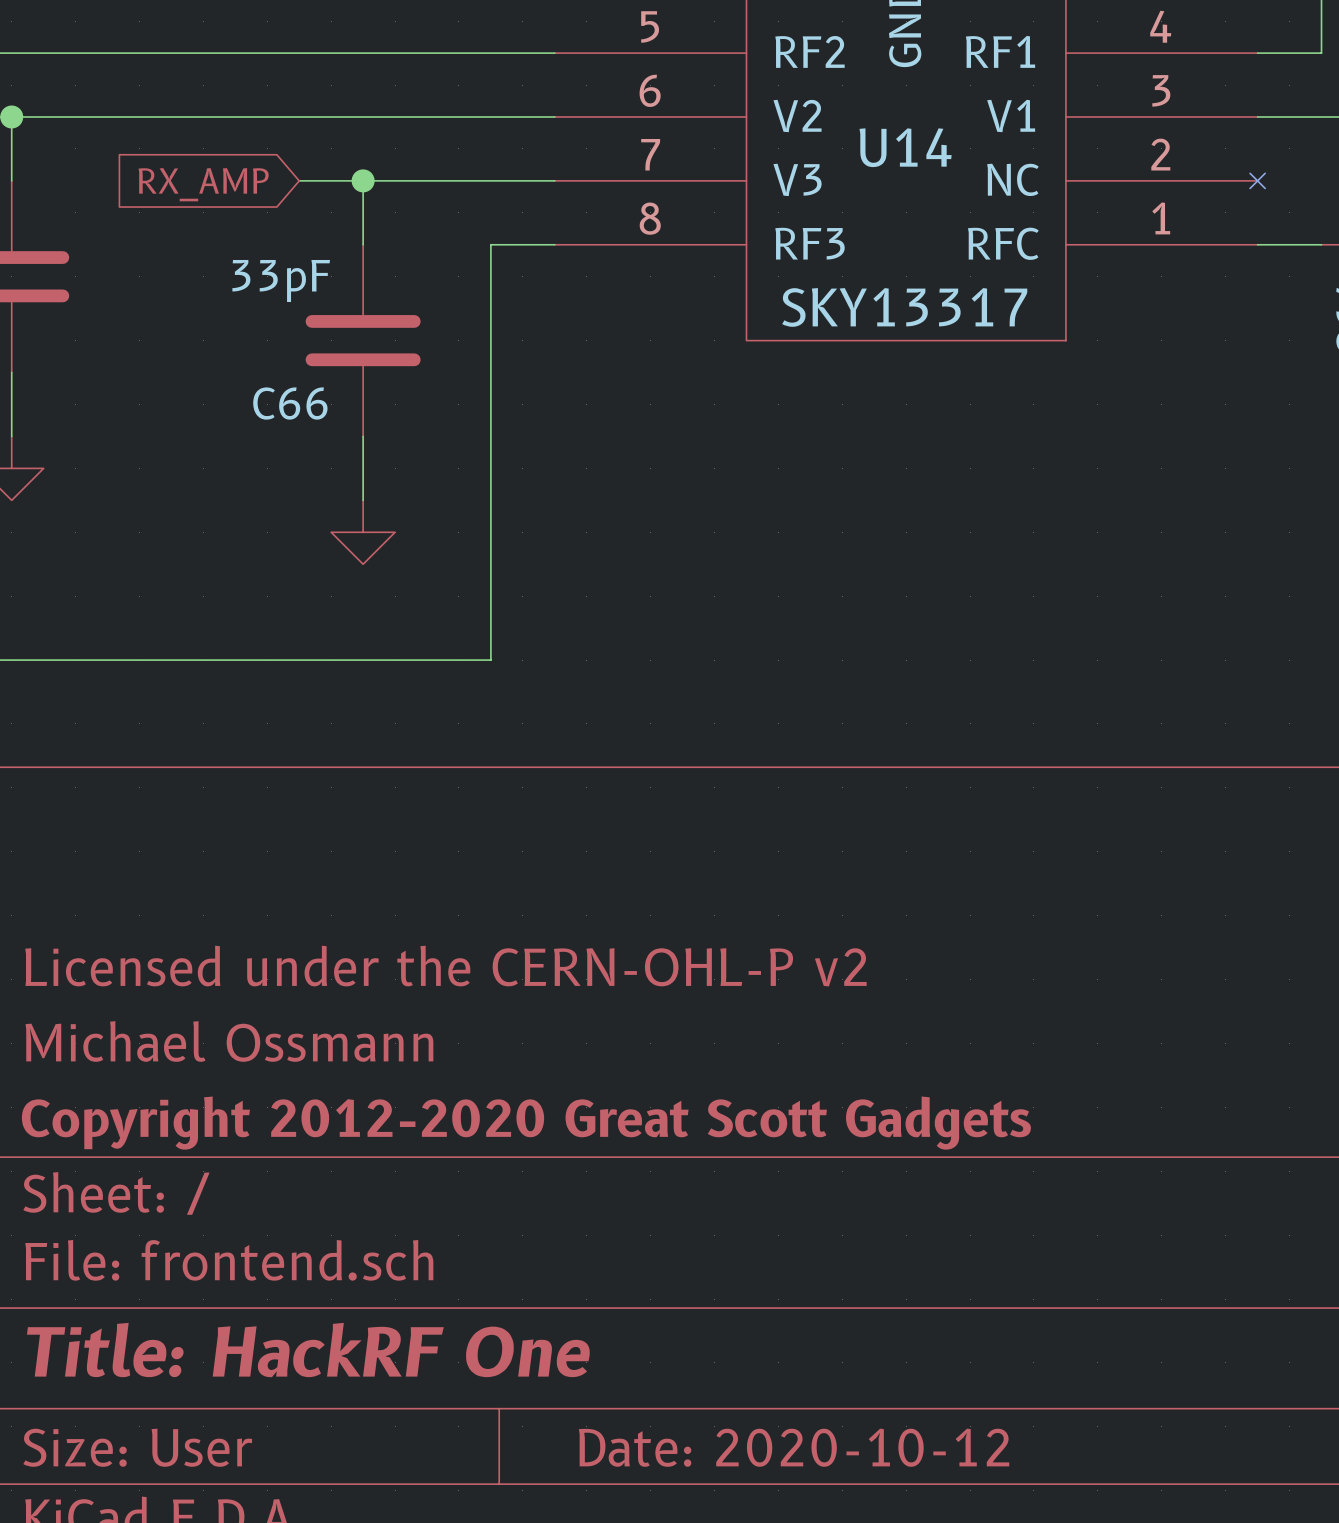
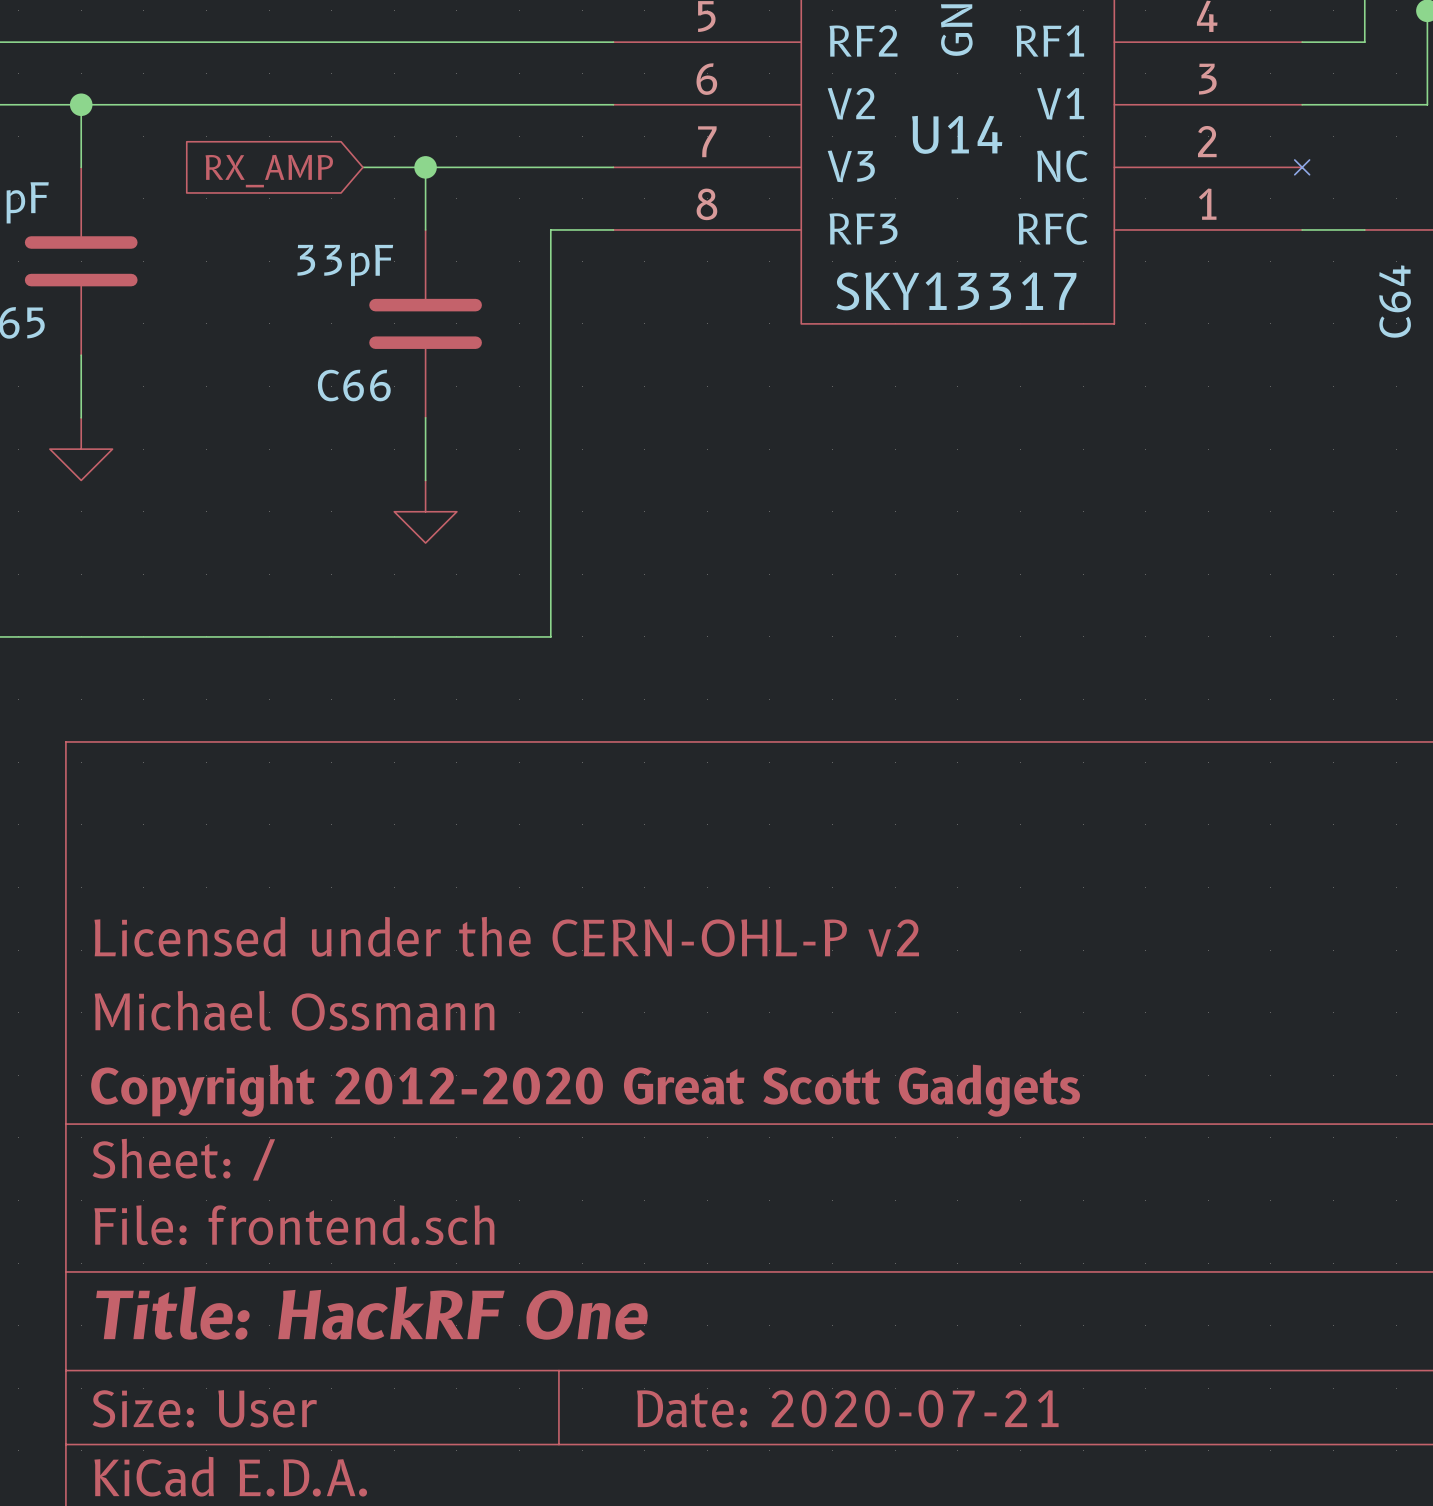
title block: Date: 2020-10-12 (794, 1447) -> Date: 2020-07-21 (847, 1408)

